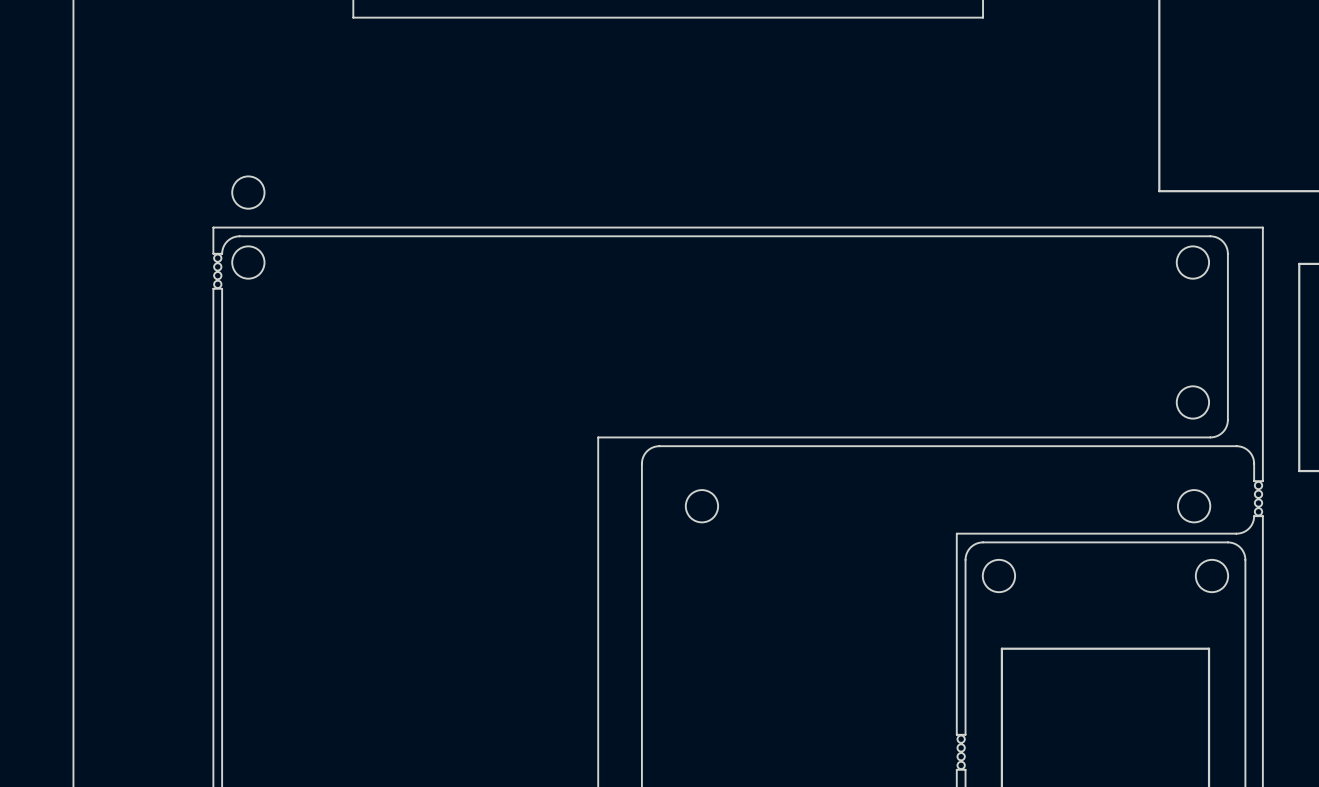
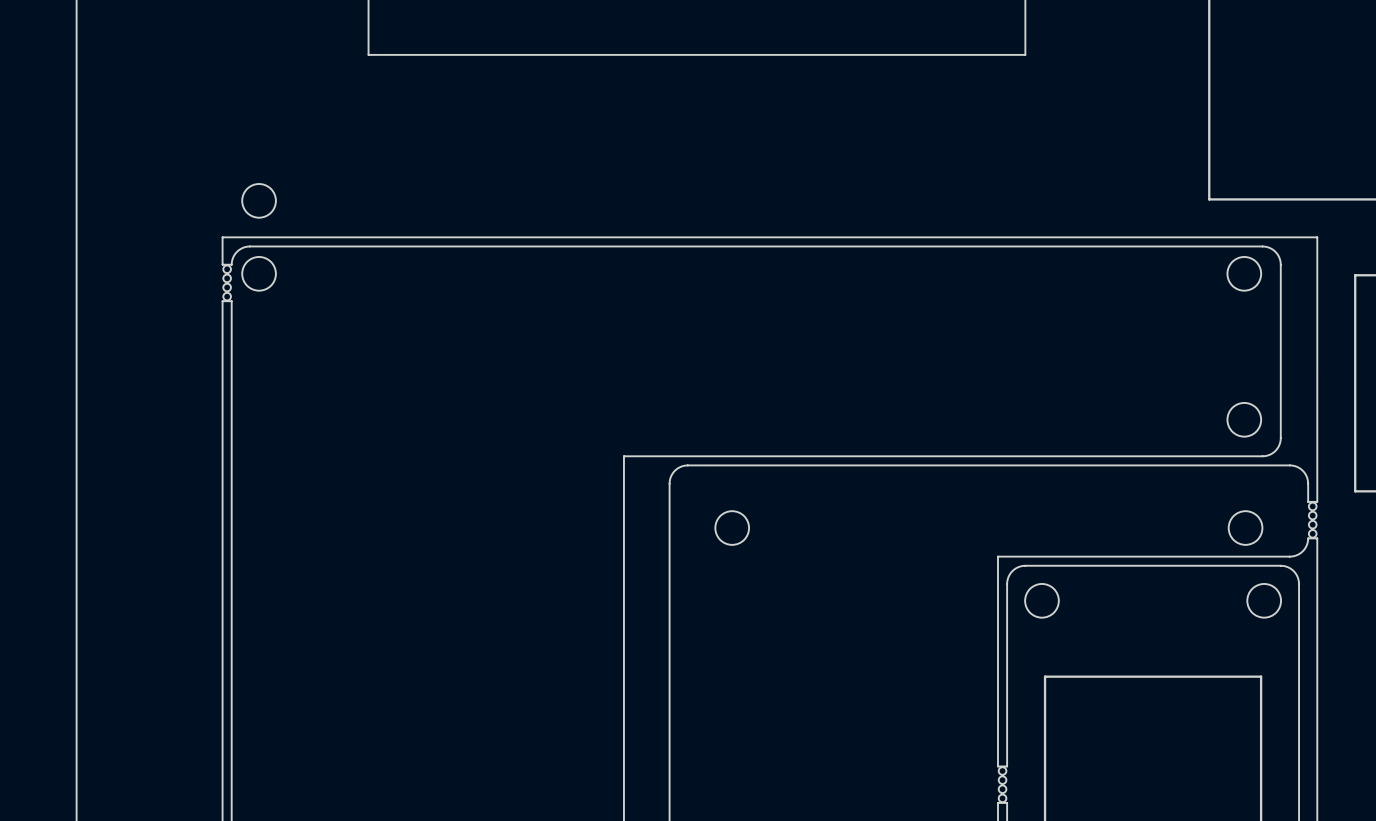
board edge: (353, 17) (983, 17) -> (368, 18) (368, 54) (1025, 54) (1025, 18)

